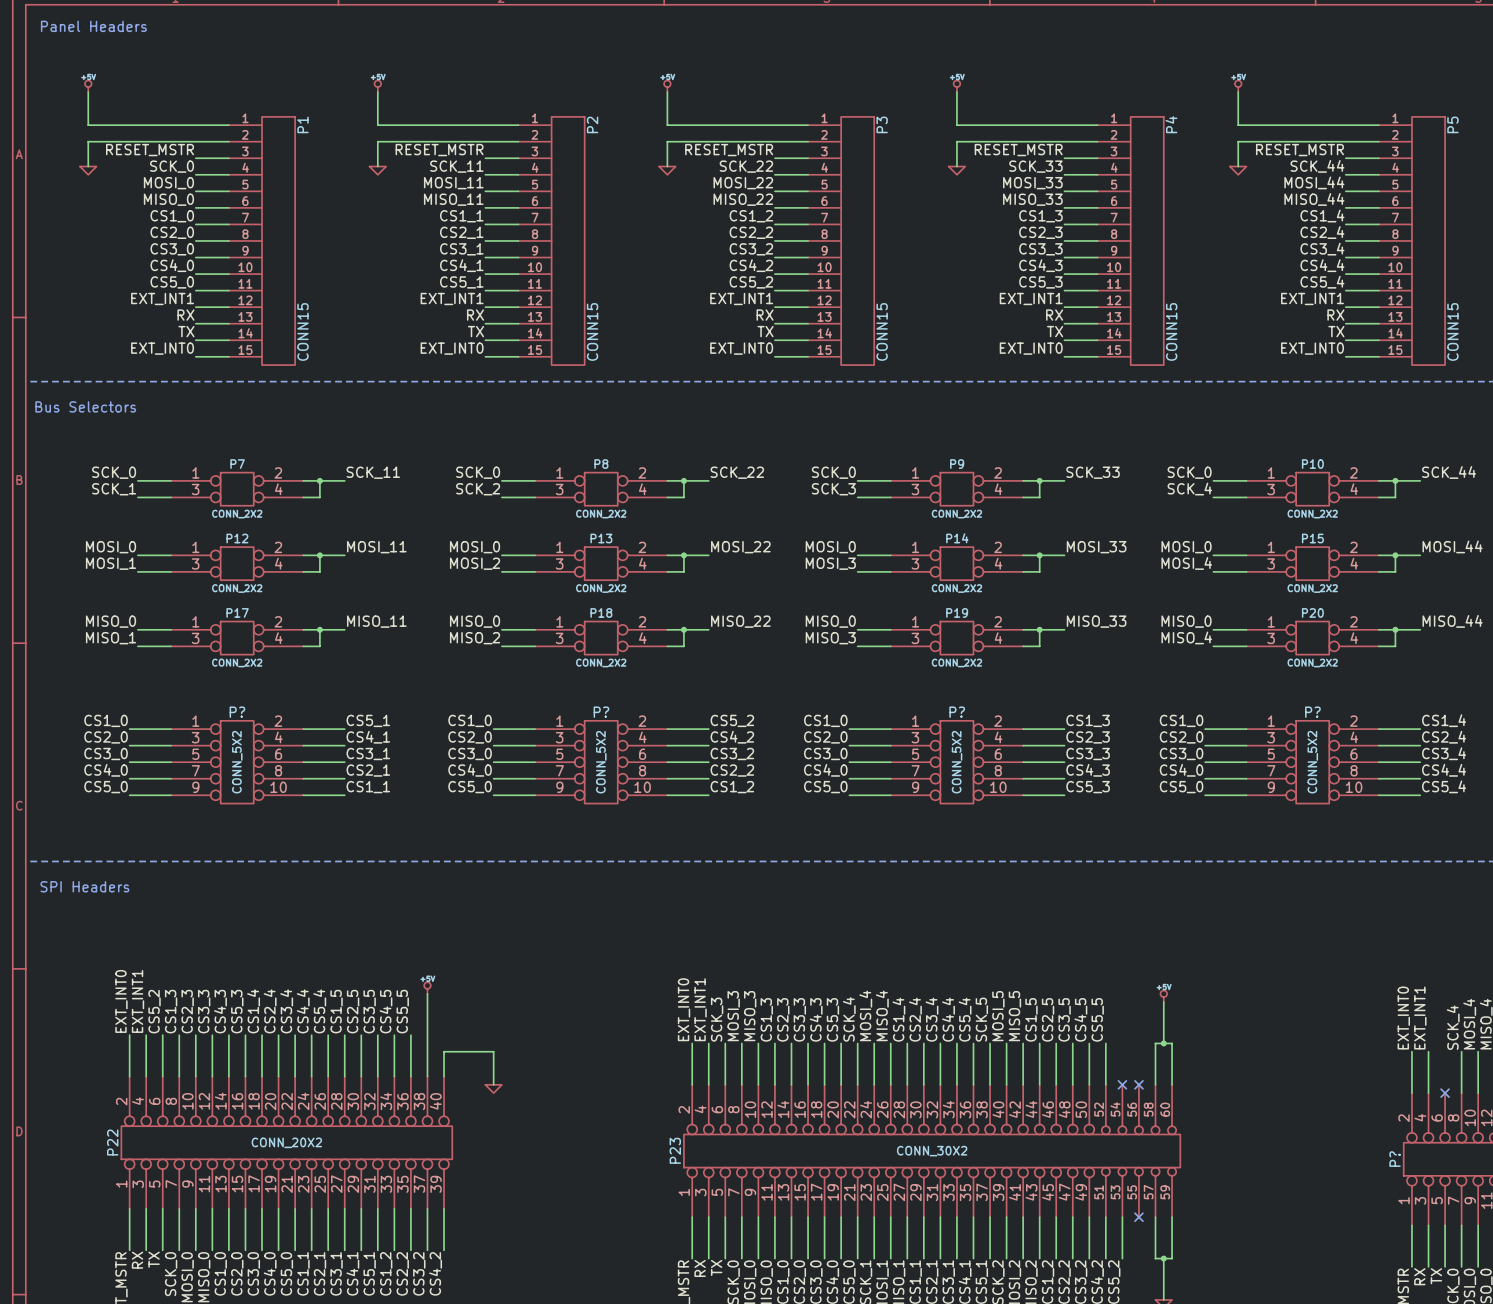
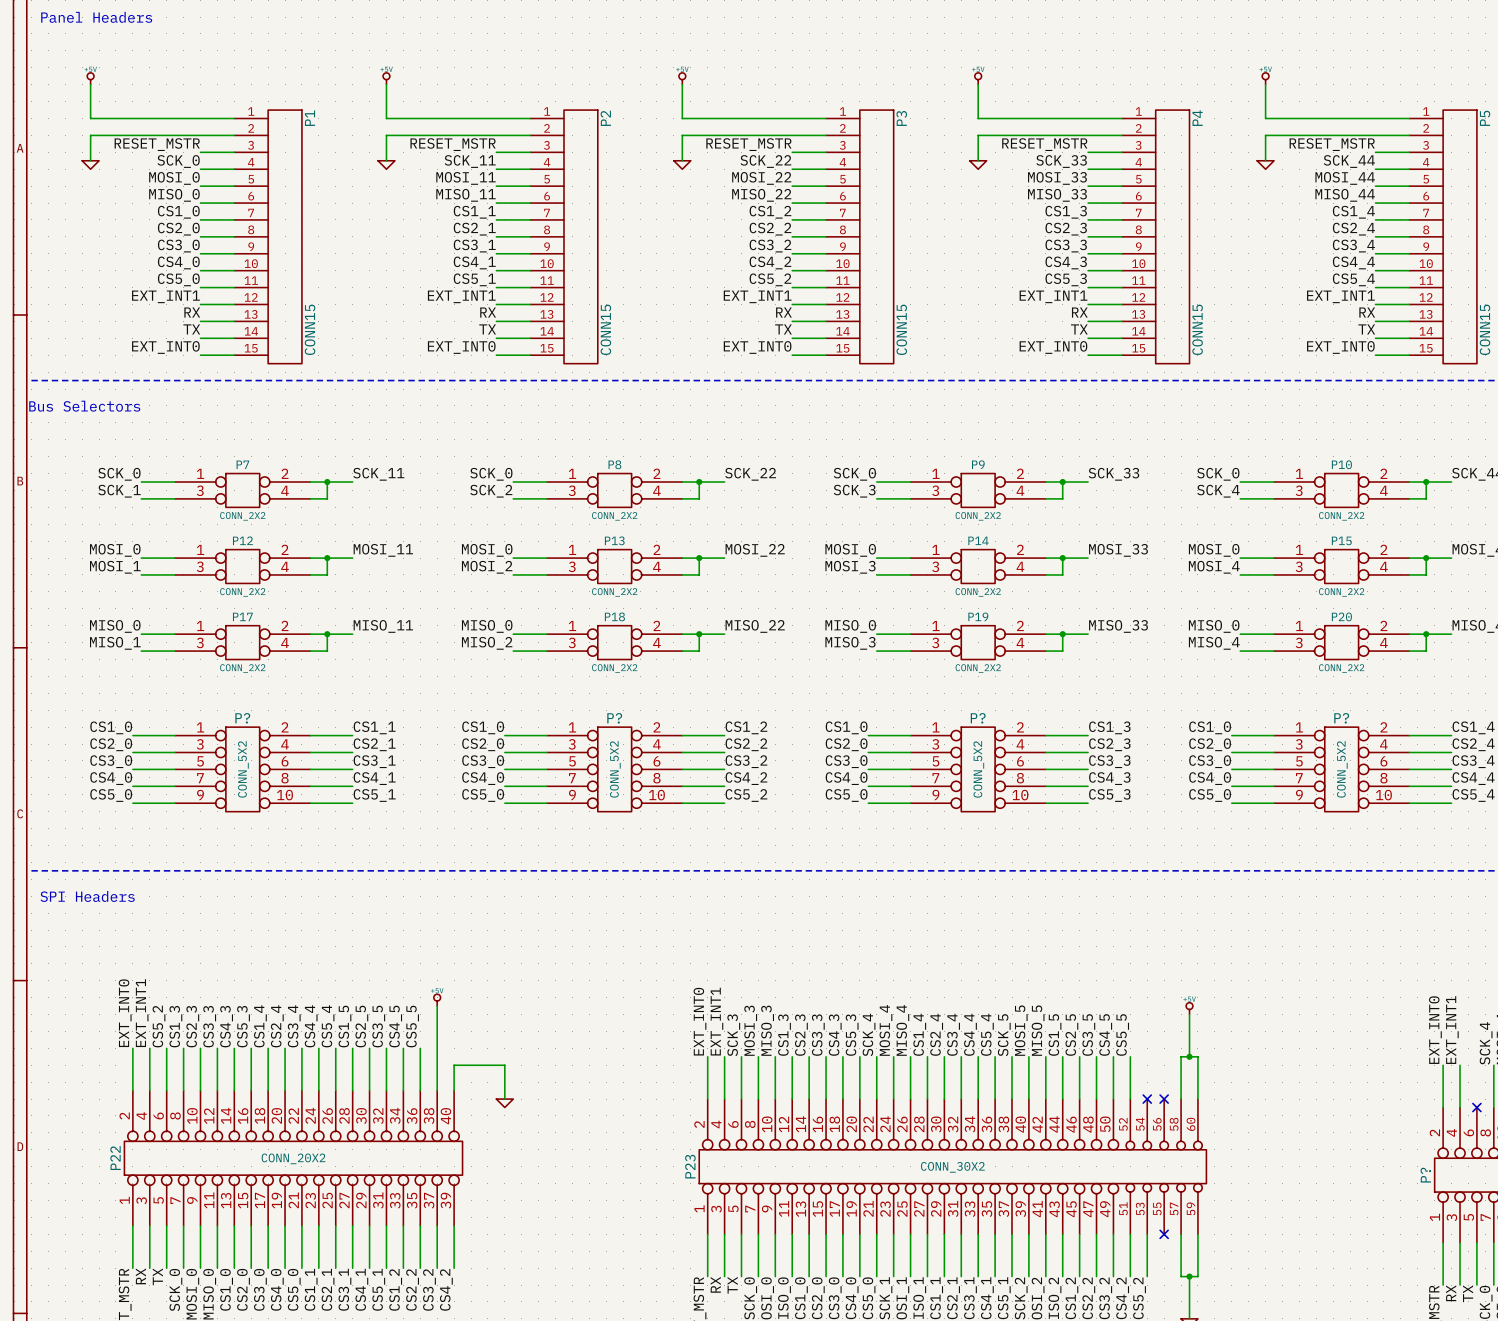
label: CS5_1 (368, 720) -> CS1_1 (374, 727)
label: CS5_2 (732, 720) -> CS1_2 (746, 727)
label: CS4_1 (368, 737) -> CS2_1 (374, 744)
label: CS4_2 (732, 737) -> CS2_2 (746, 744)
label: CS2_1 (368, 770) -> CS4_1 (374, 778)
label: CS2_2 (732, 770) -> CS4_2 (746, 778)
label: CS1_1 (368, 787) -> CS5_1 (374, 795)
label: CS1_2 (732, 787) -> CS5_2 (746, 795)

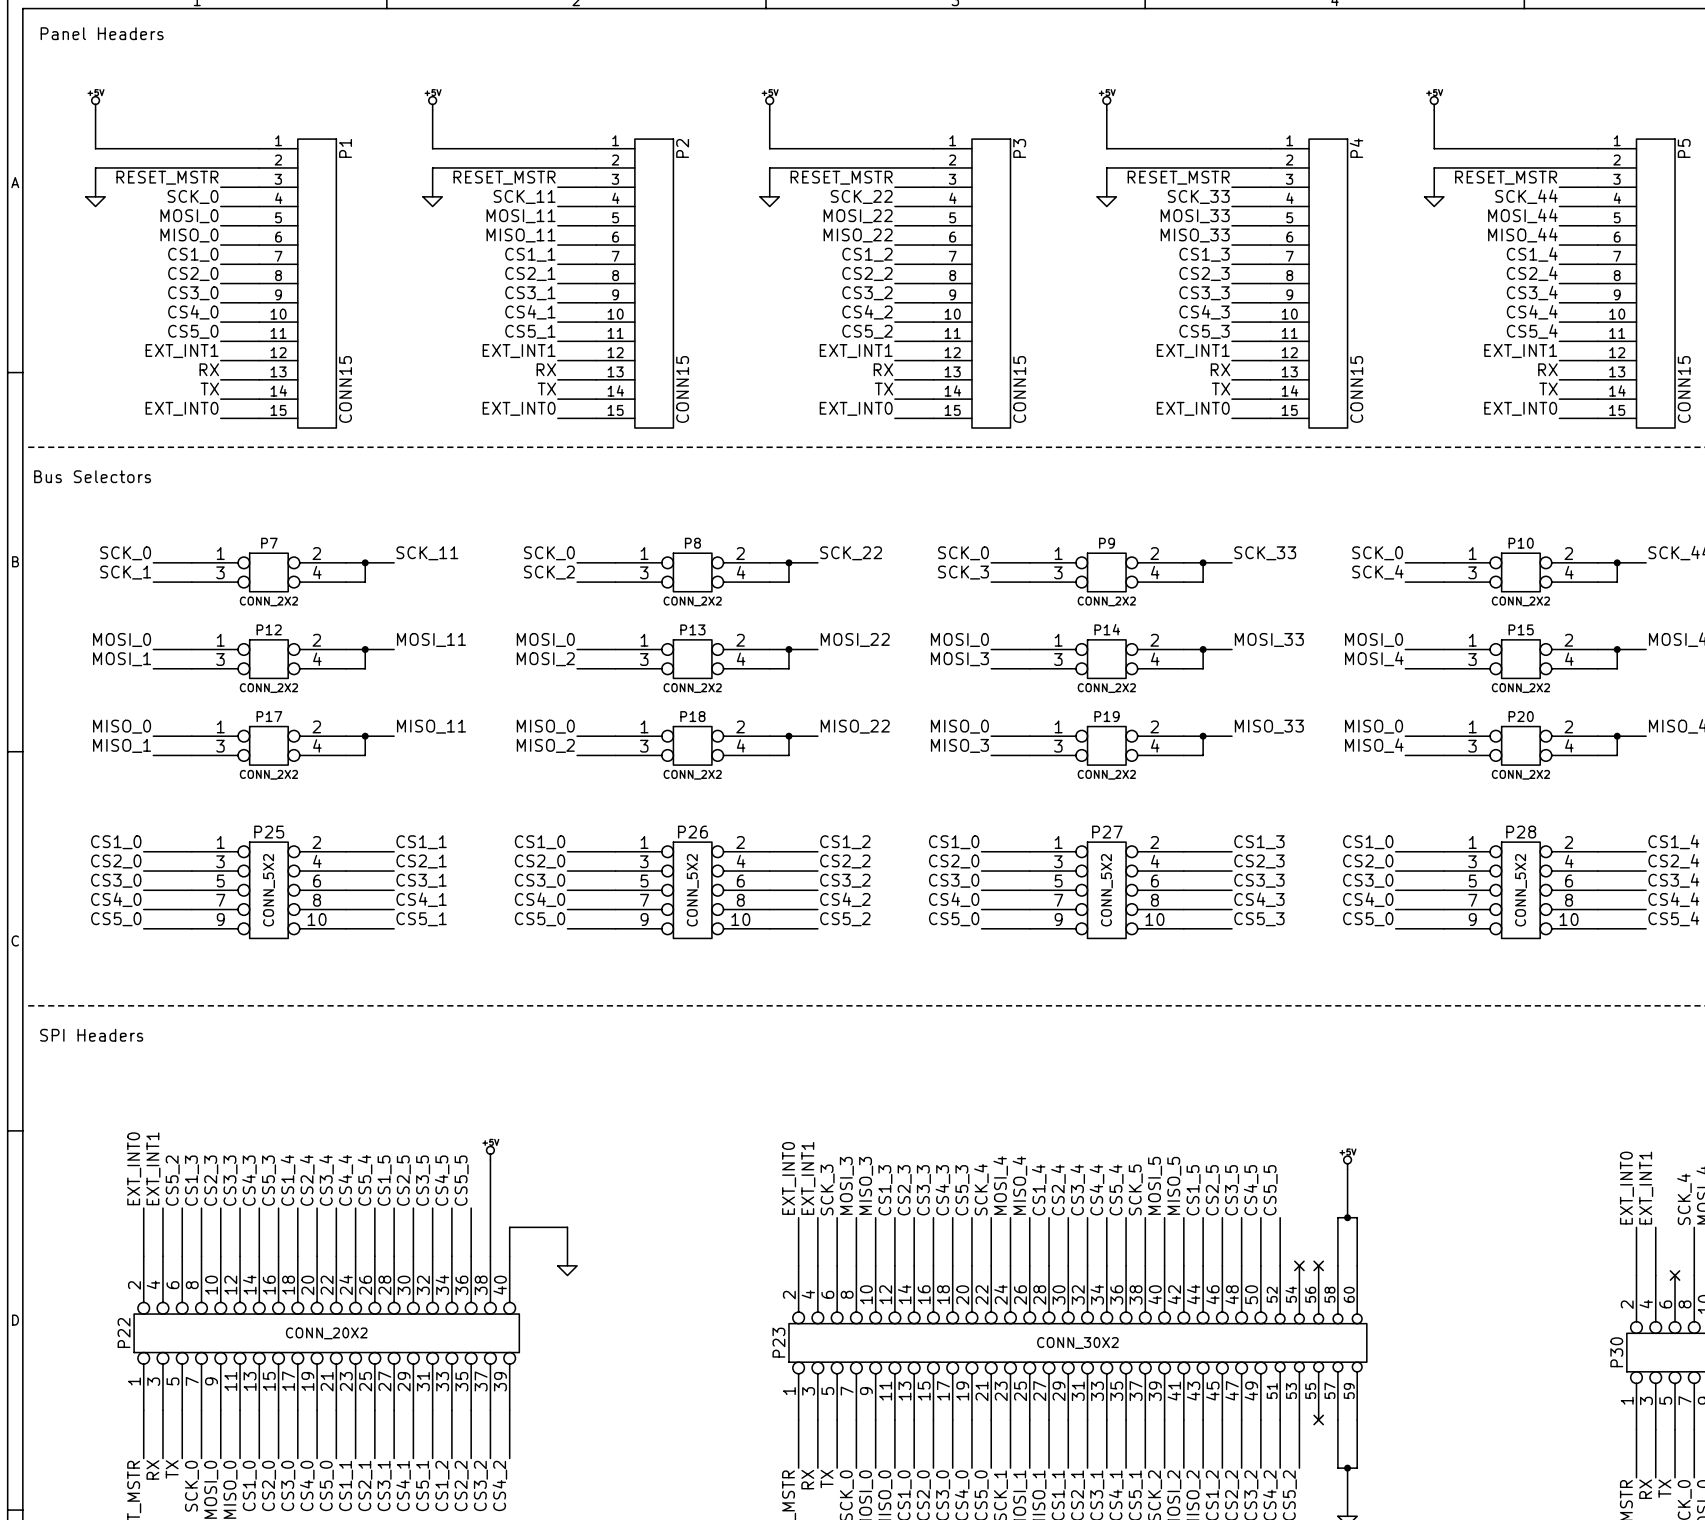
P? name: P? (242, 718) -> P25 (269, 832)
P? name: P? (614, 718) -> P26 (692, 832)
P? name: P? (978, 718) -> P27 (1107, 832)
P? name: P? (1341, 718) -> P28 (1521, 832)
P? name: P? (1425, 1175) -> P30 (1616, 1352)

